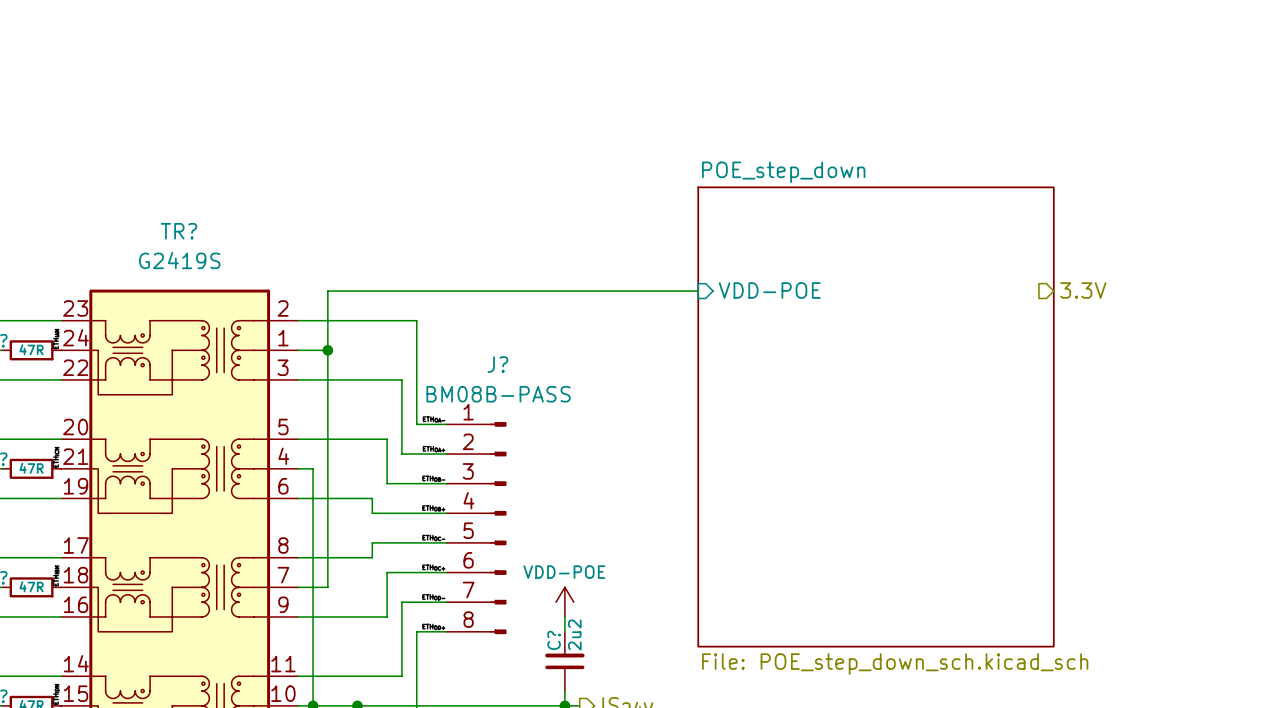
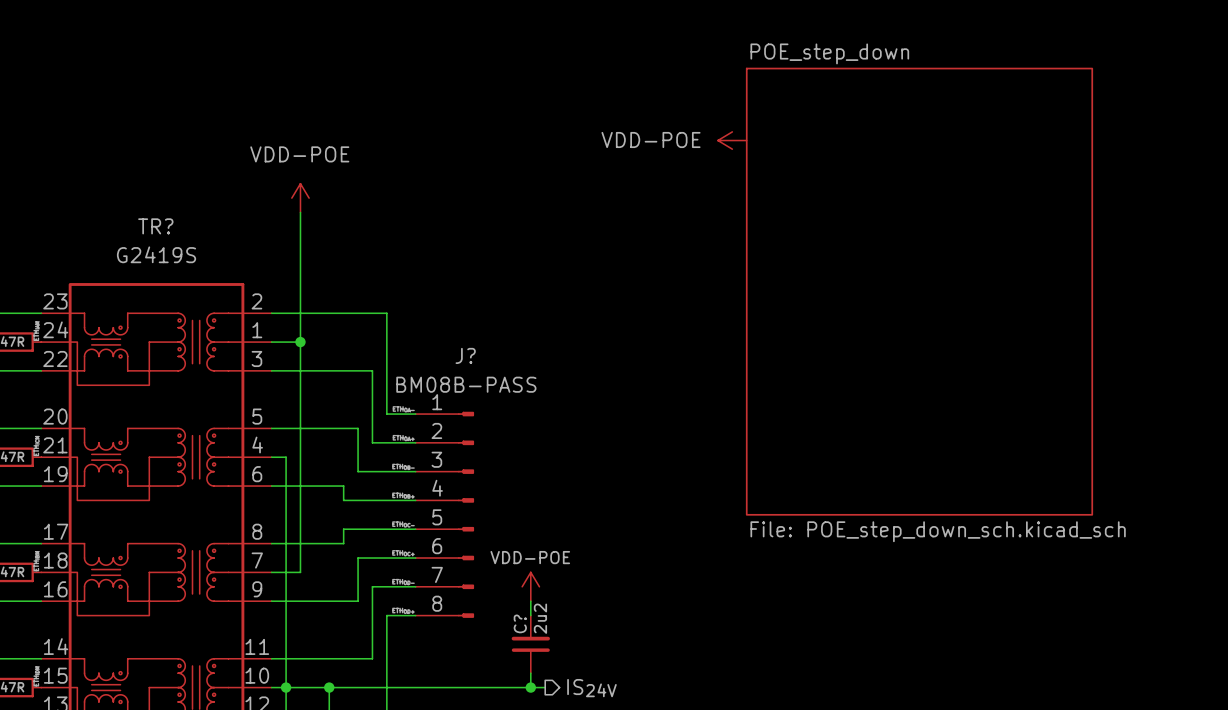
power symbol: none -> VDD-POE (732, 140)
power symbol: none -> VDD-POE (300, 198)
sheet pin: VDD-POE (769, 290) -> none
hierarchical label: 3.3V (1083, 290) -> none
wire: (327, 291) (698, 291) -> (300, 284) (300, 212)
sheet POE_step_down position: (876, 416) -> (919, 291)

